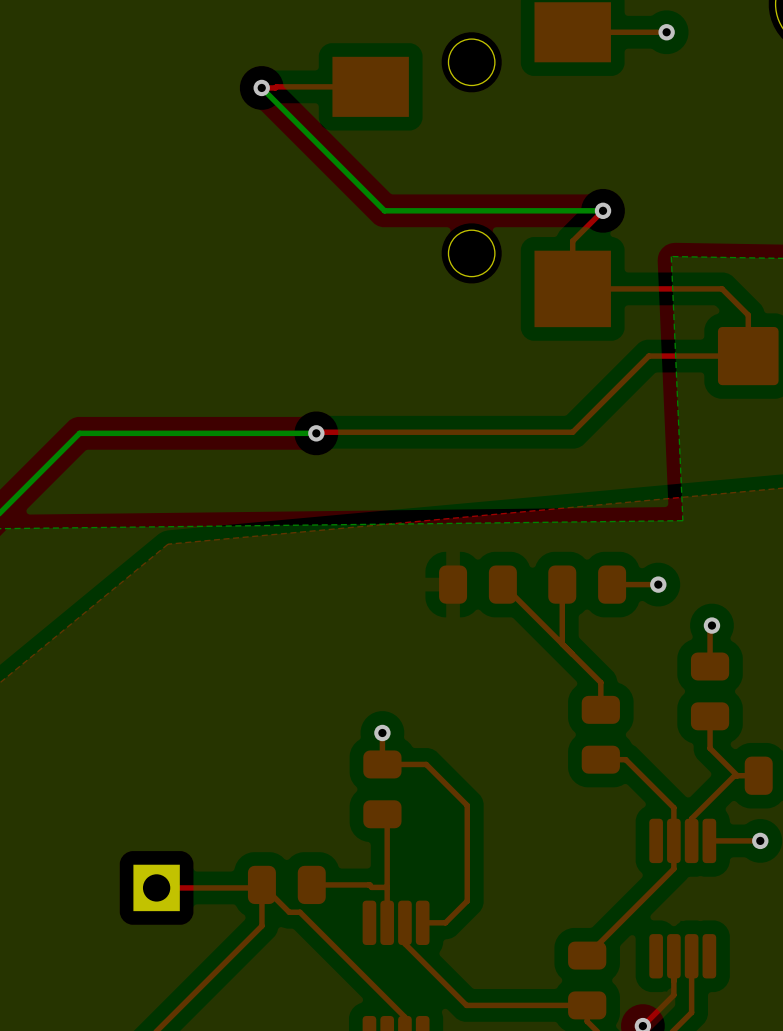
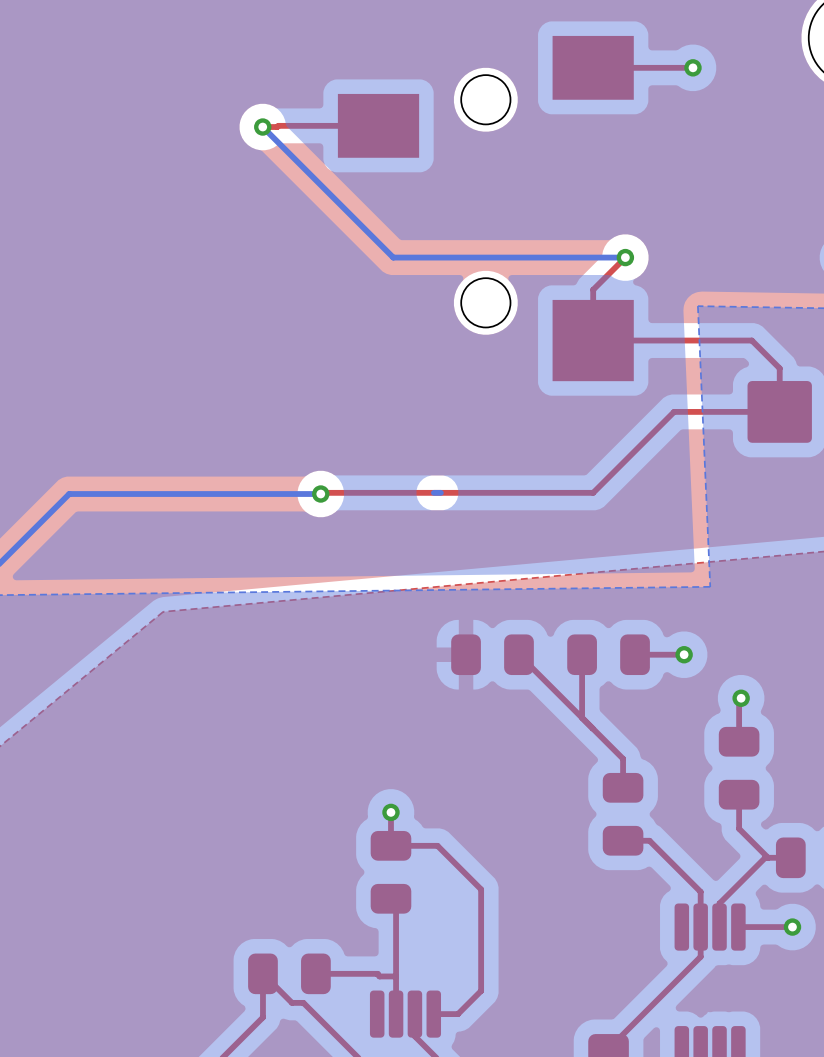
bottom track: none -> (440, 492) (433, 492)
top track: (261, 884) (258, 887) (156, 887) -> none
part: (156, 887) -> none

